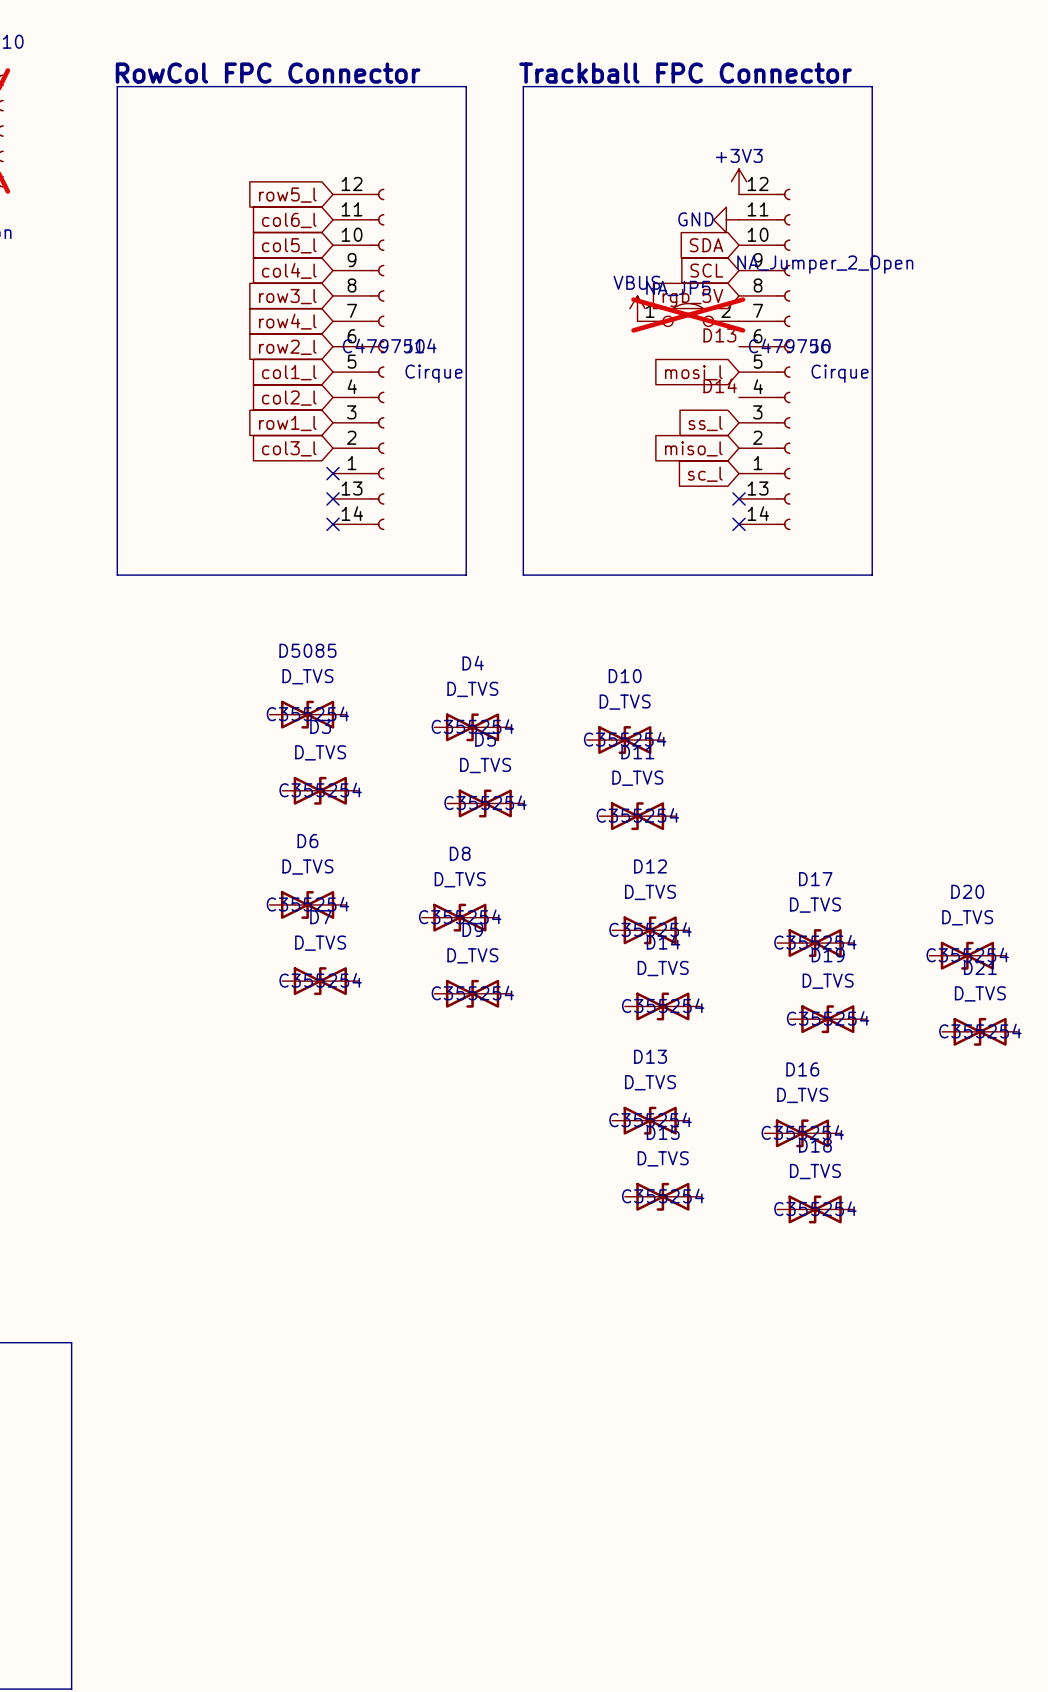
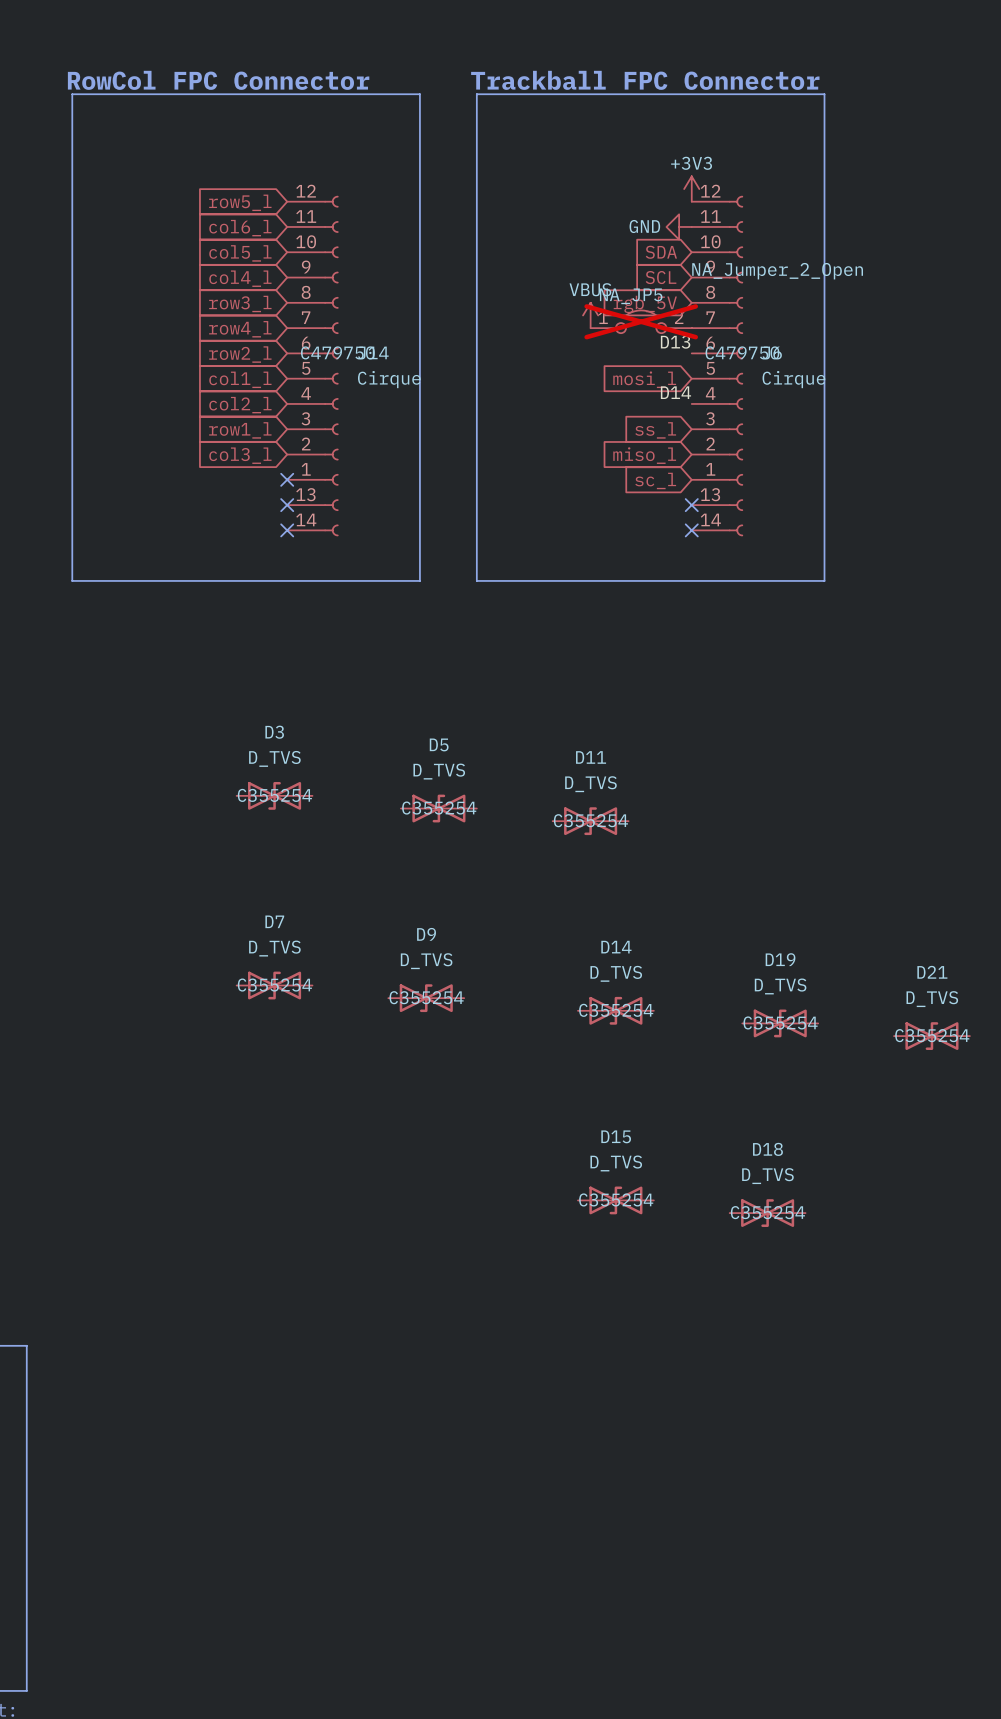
D5085: D_TVS (307, 714) -> none
D4: D_TVS (472, 727) -> none
D10: D_TVS (624, 740) -> none
D6: D_TVS (307, 904) -> none
D8: D_TVS (459, 917) -> none
D12: D_TVS (650, 930) -> none
D17: D_TVS (815, 943) -> none
D20: D_TVS (967, 955) -> none
D13: D_TVS (650, 1120) -> none
D16: D_TVS (802, 1133) -> none

